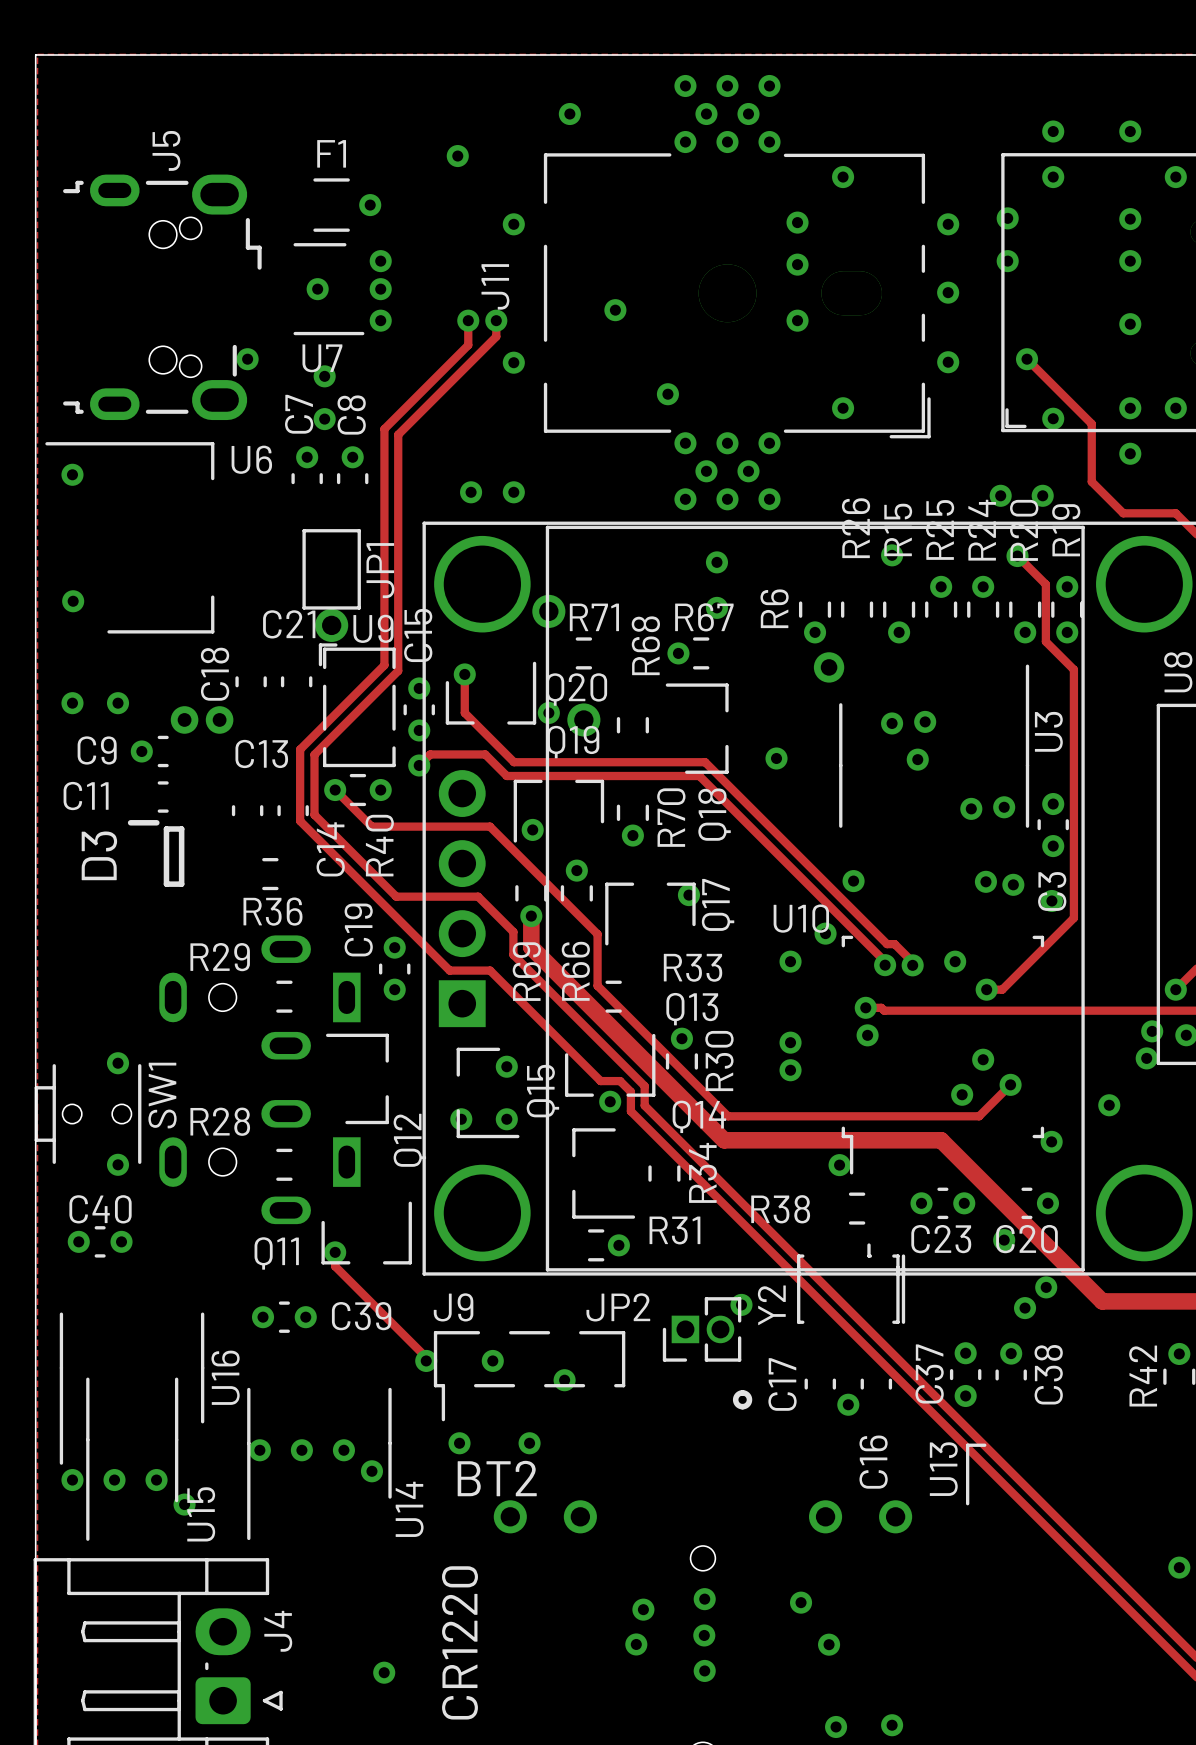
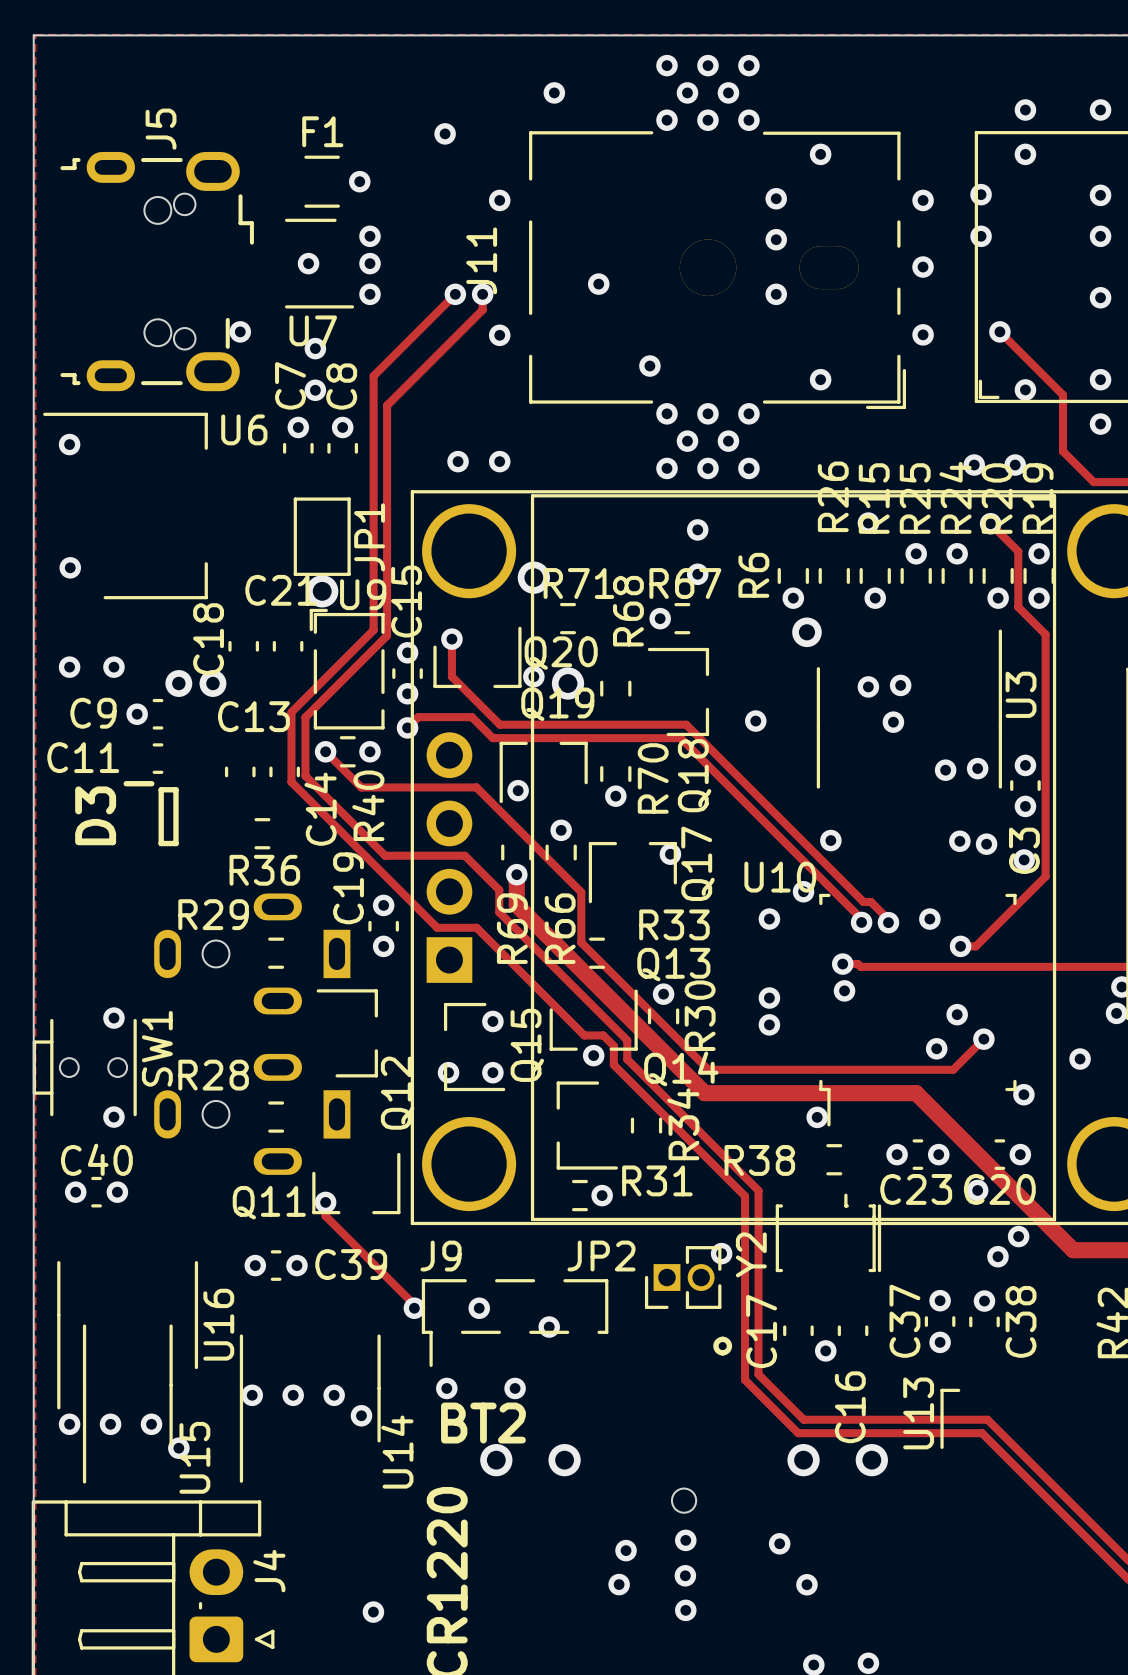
track: (468, 320) (468, 345) (384, 429) -> (455, 294) (373, 376) (373, 399)
track: (779, 1240) (1014, 1475) -> (758, 1190) (758, 1374) (803, 1419) (987, 1419)
track: (765, 1245) (1008, 1489) -> (745, 1196) (745, 1380) (798, 1433) (982, 1433)

